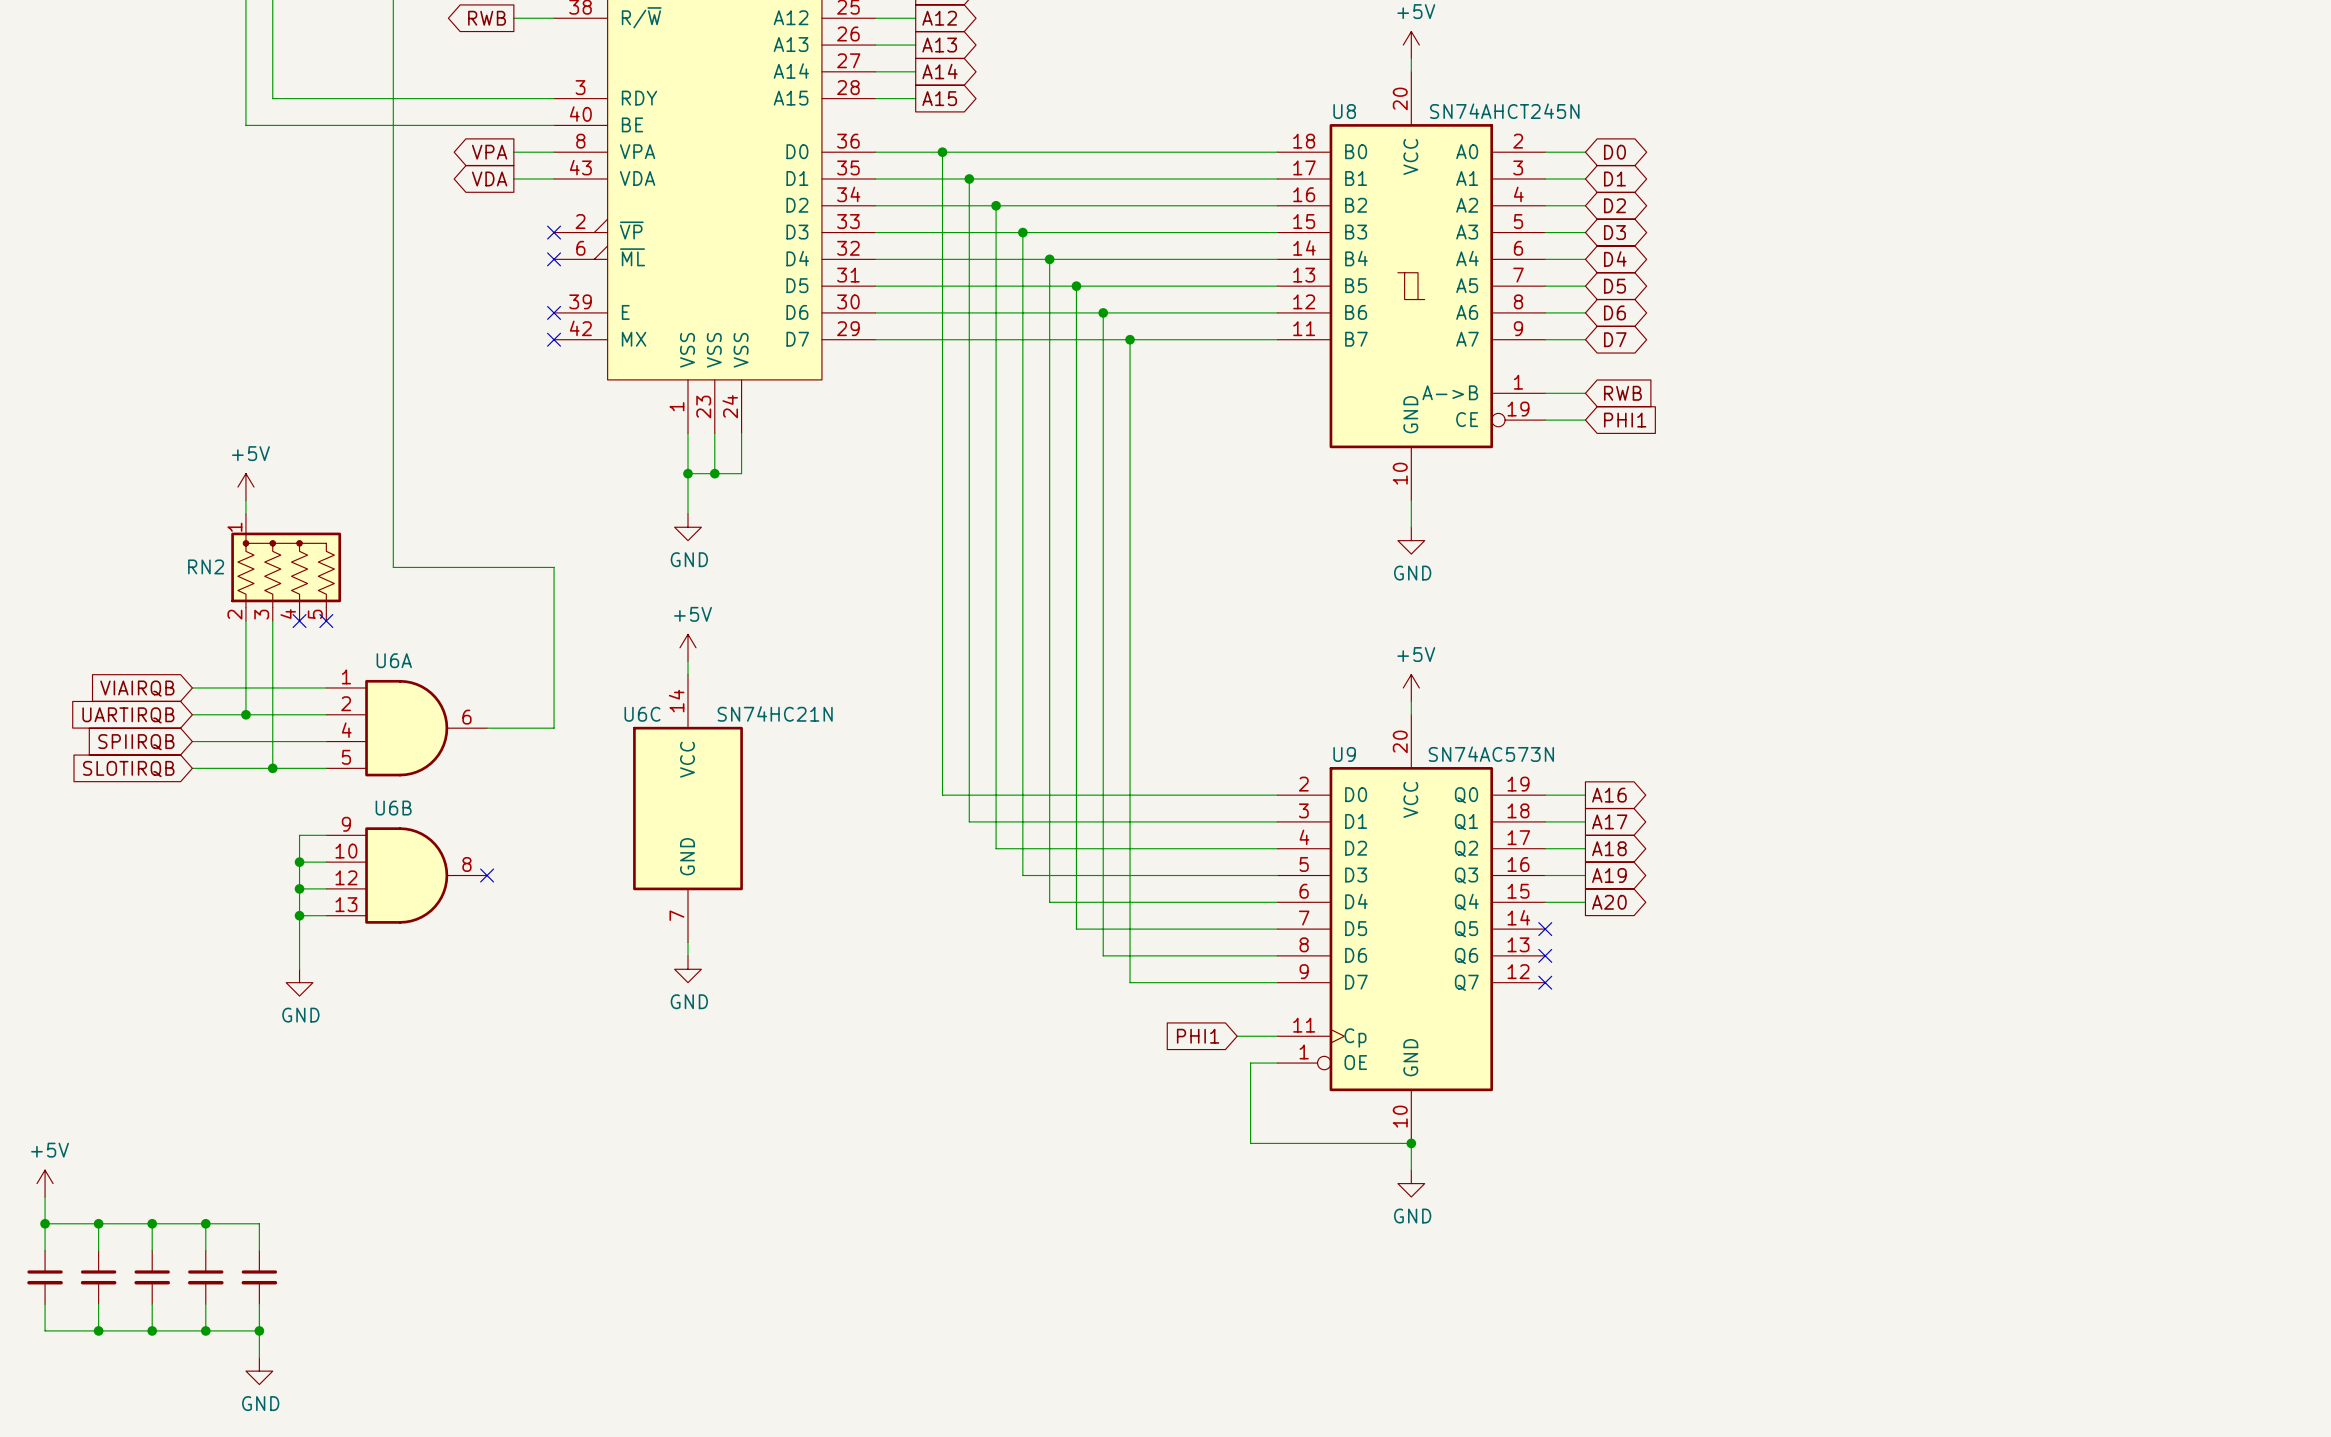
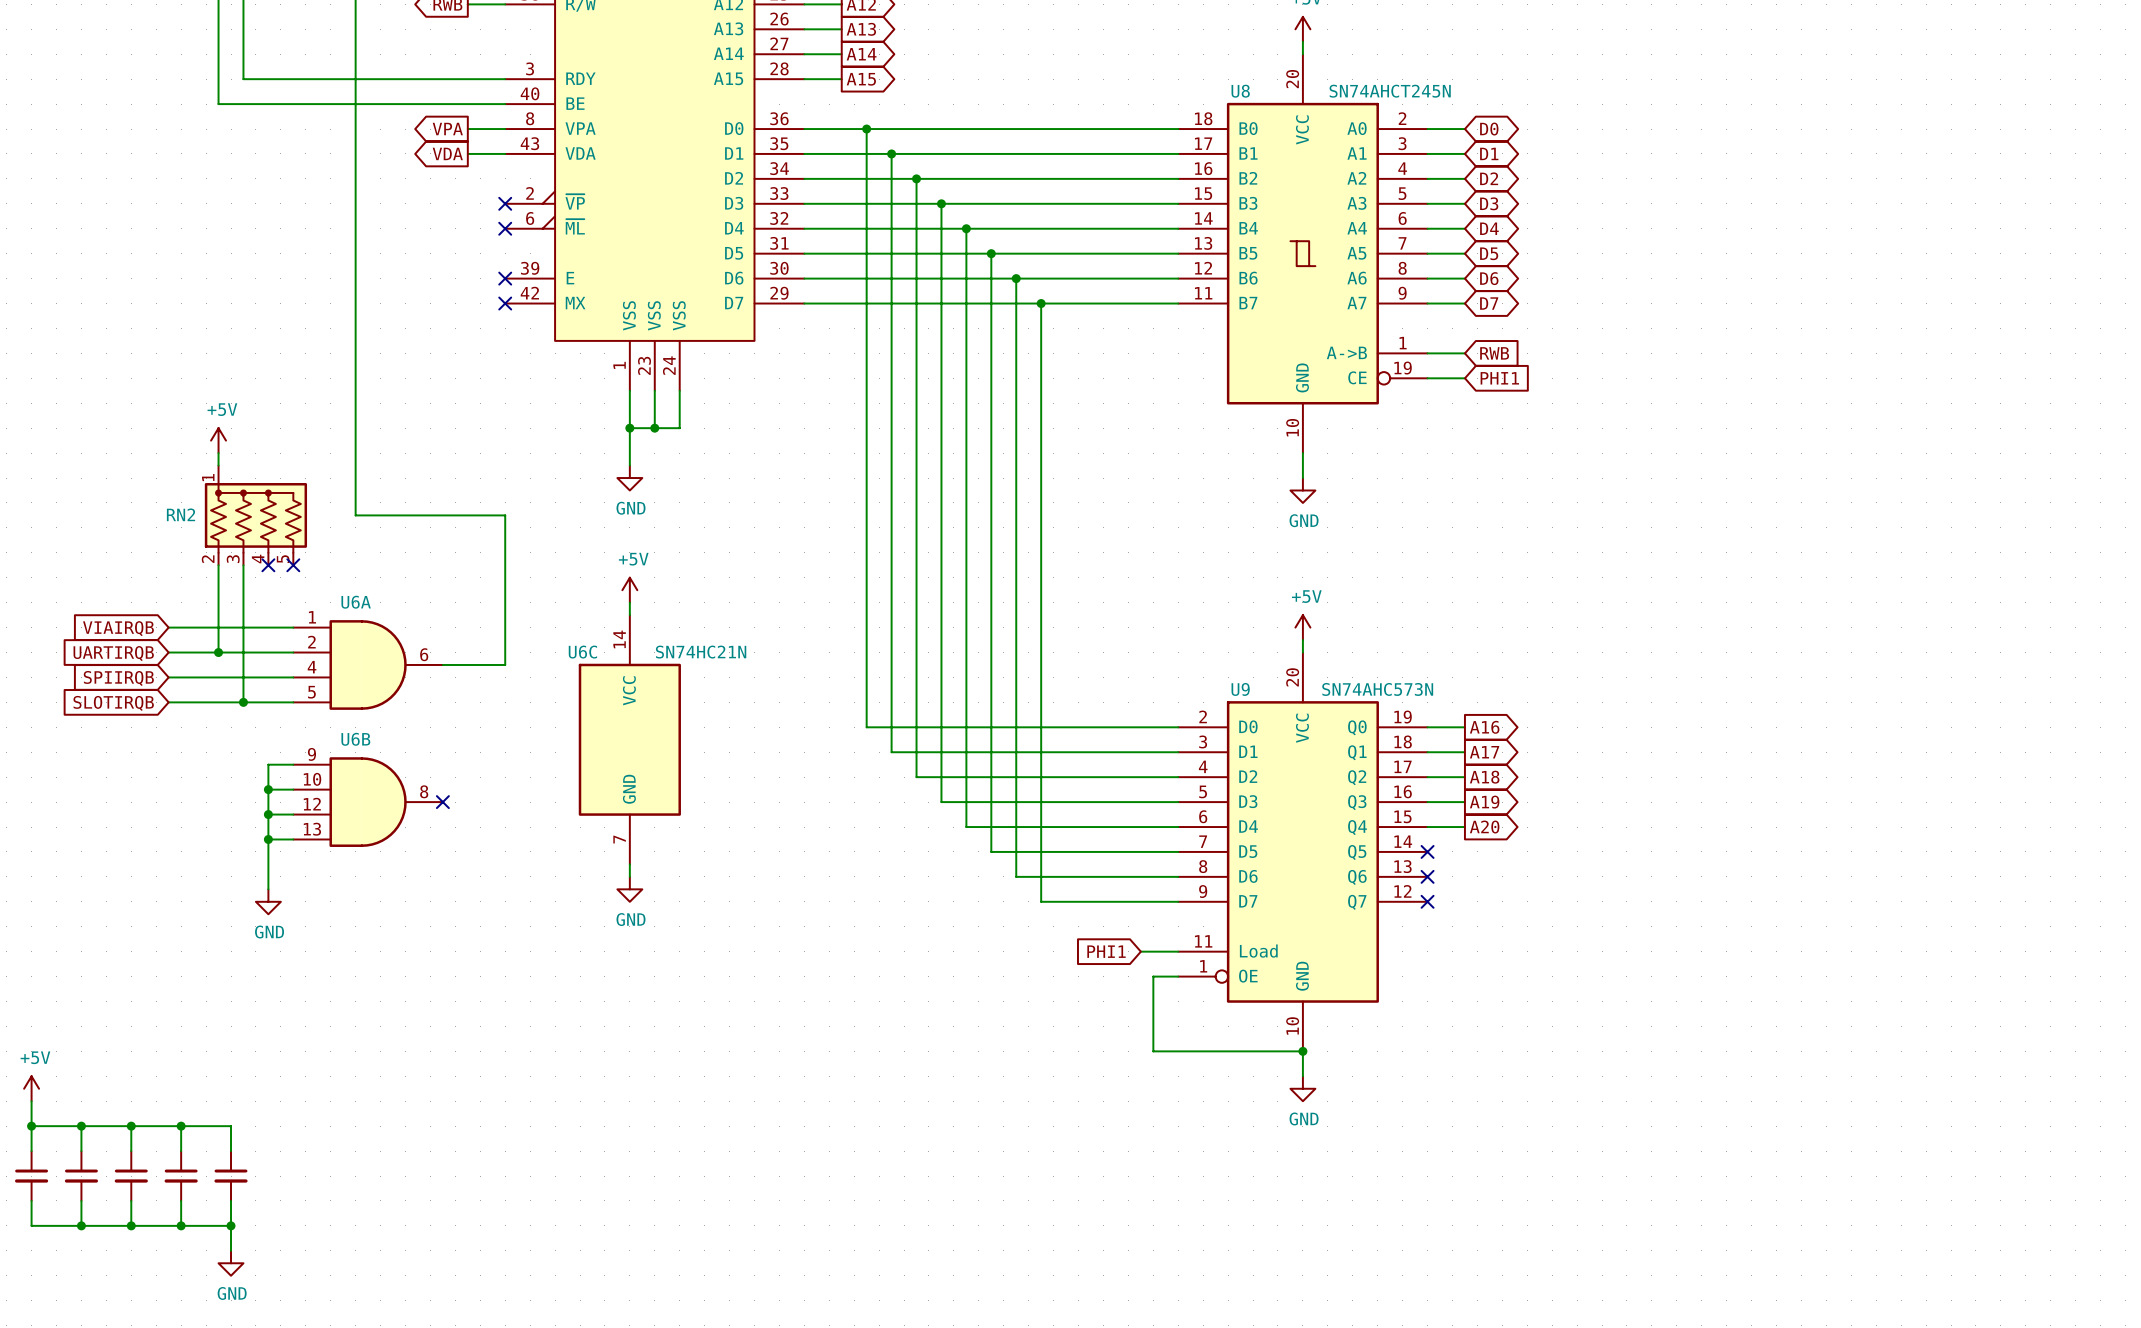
U9 symbol: [1277, 714, 1546, 1144] -> [1178, 652, 1428, 1052]
U9 value: SN74AC573N (1491, 754) -> SN74AHC573N (1377, 689)

